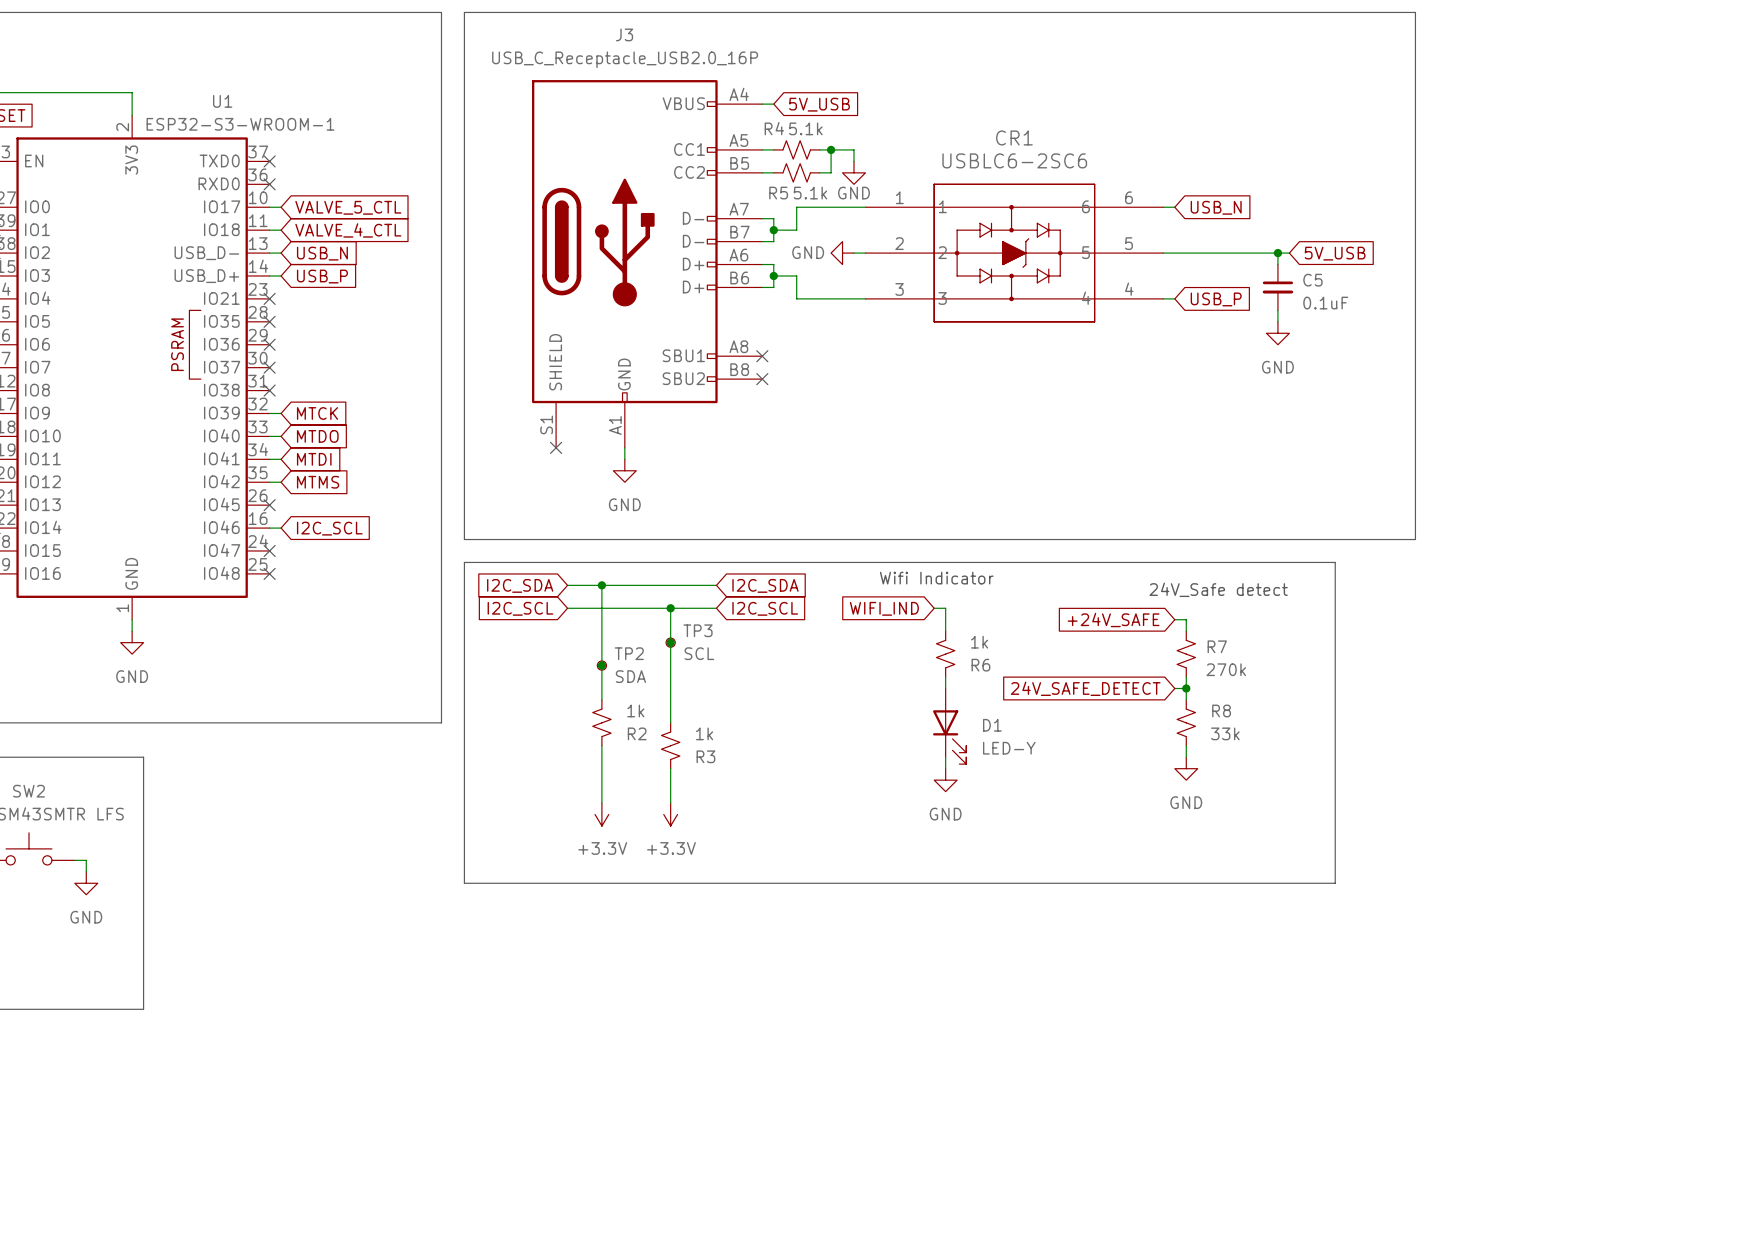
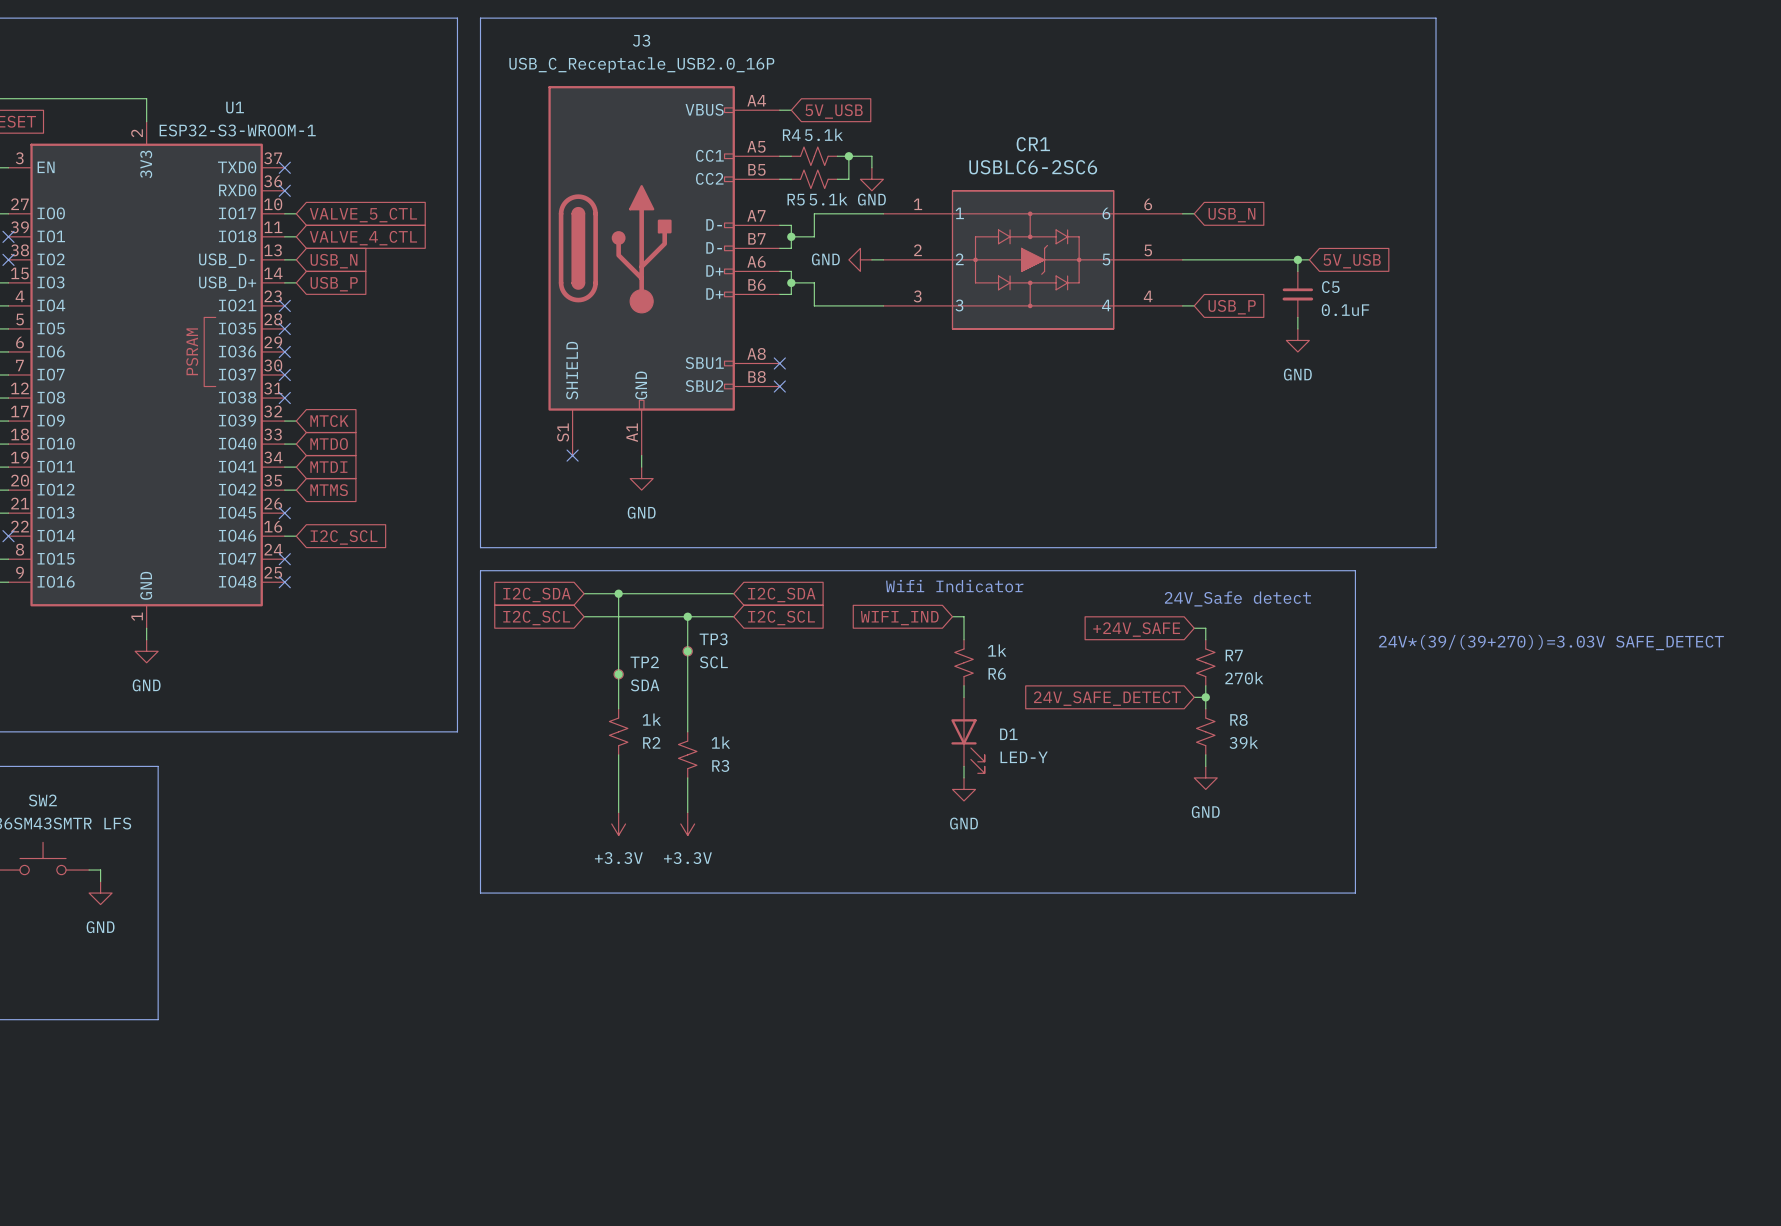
text: none -> 24V*(39/(39+270))=3.03V SAFE_DETECT (1551, 642)
R8 value: 33k (1225, 733) -> 39k (1243, 742)

